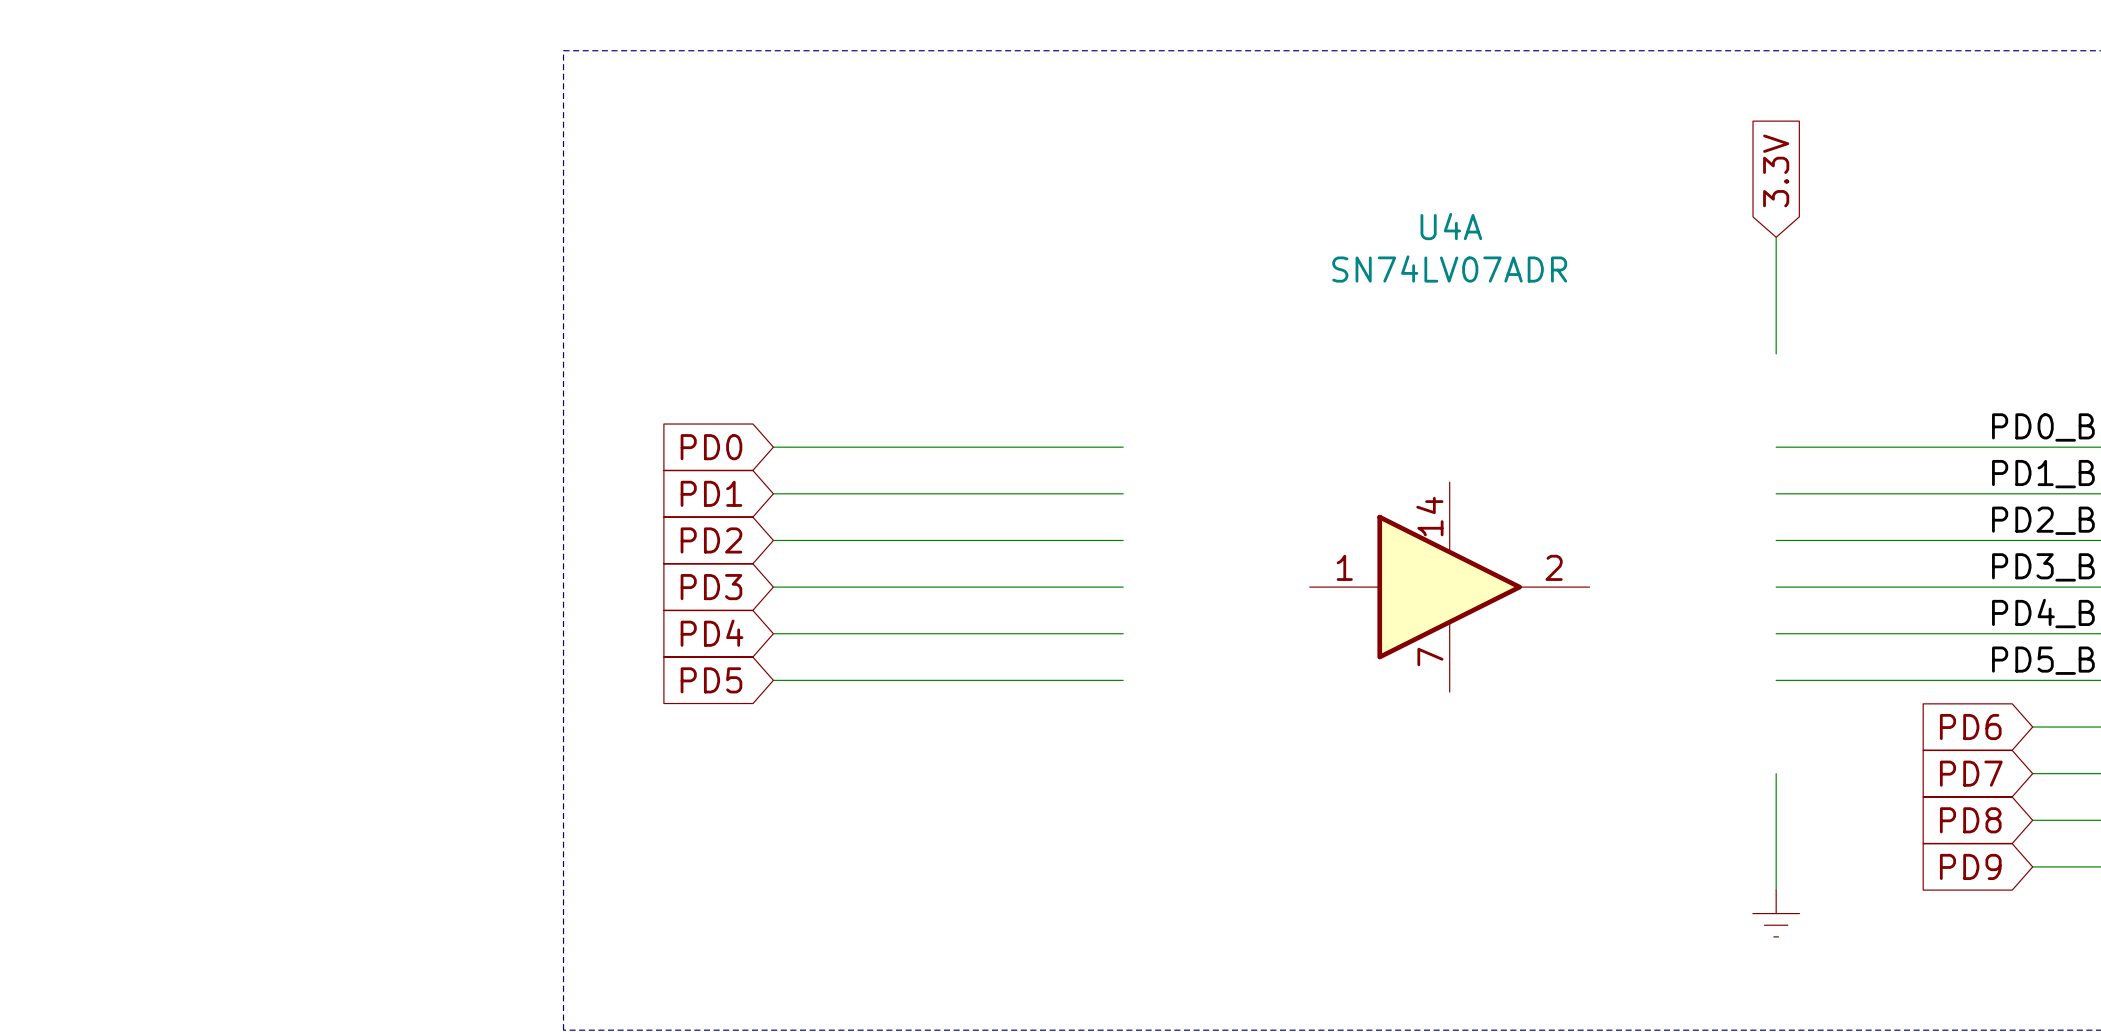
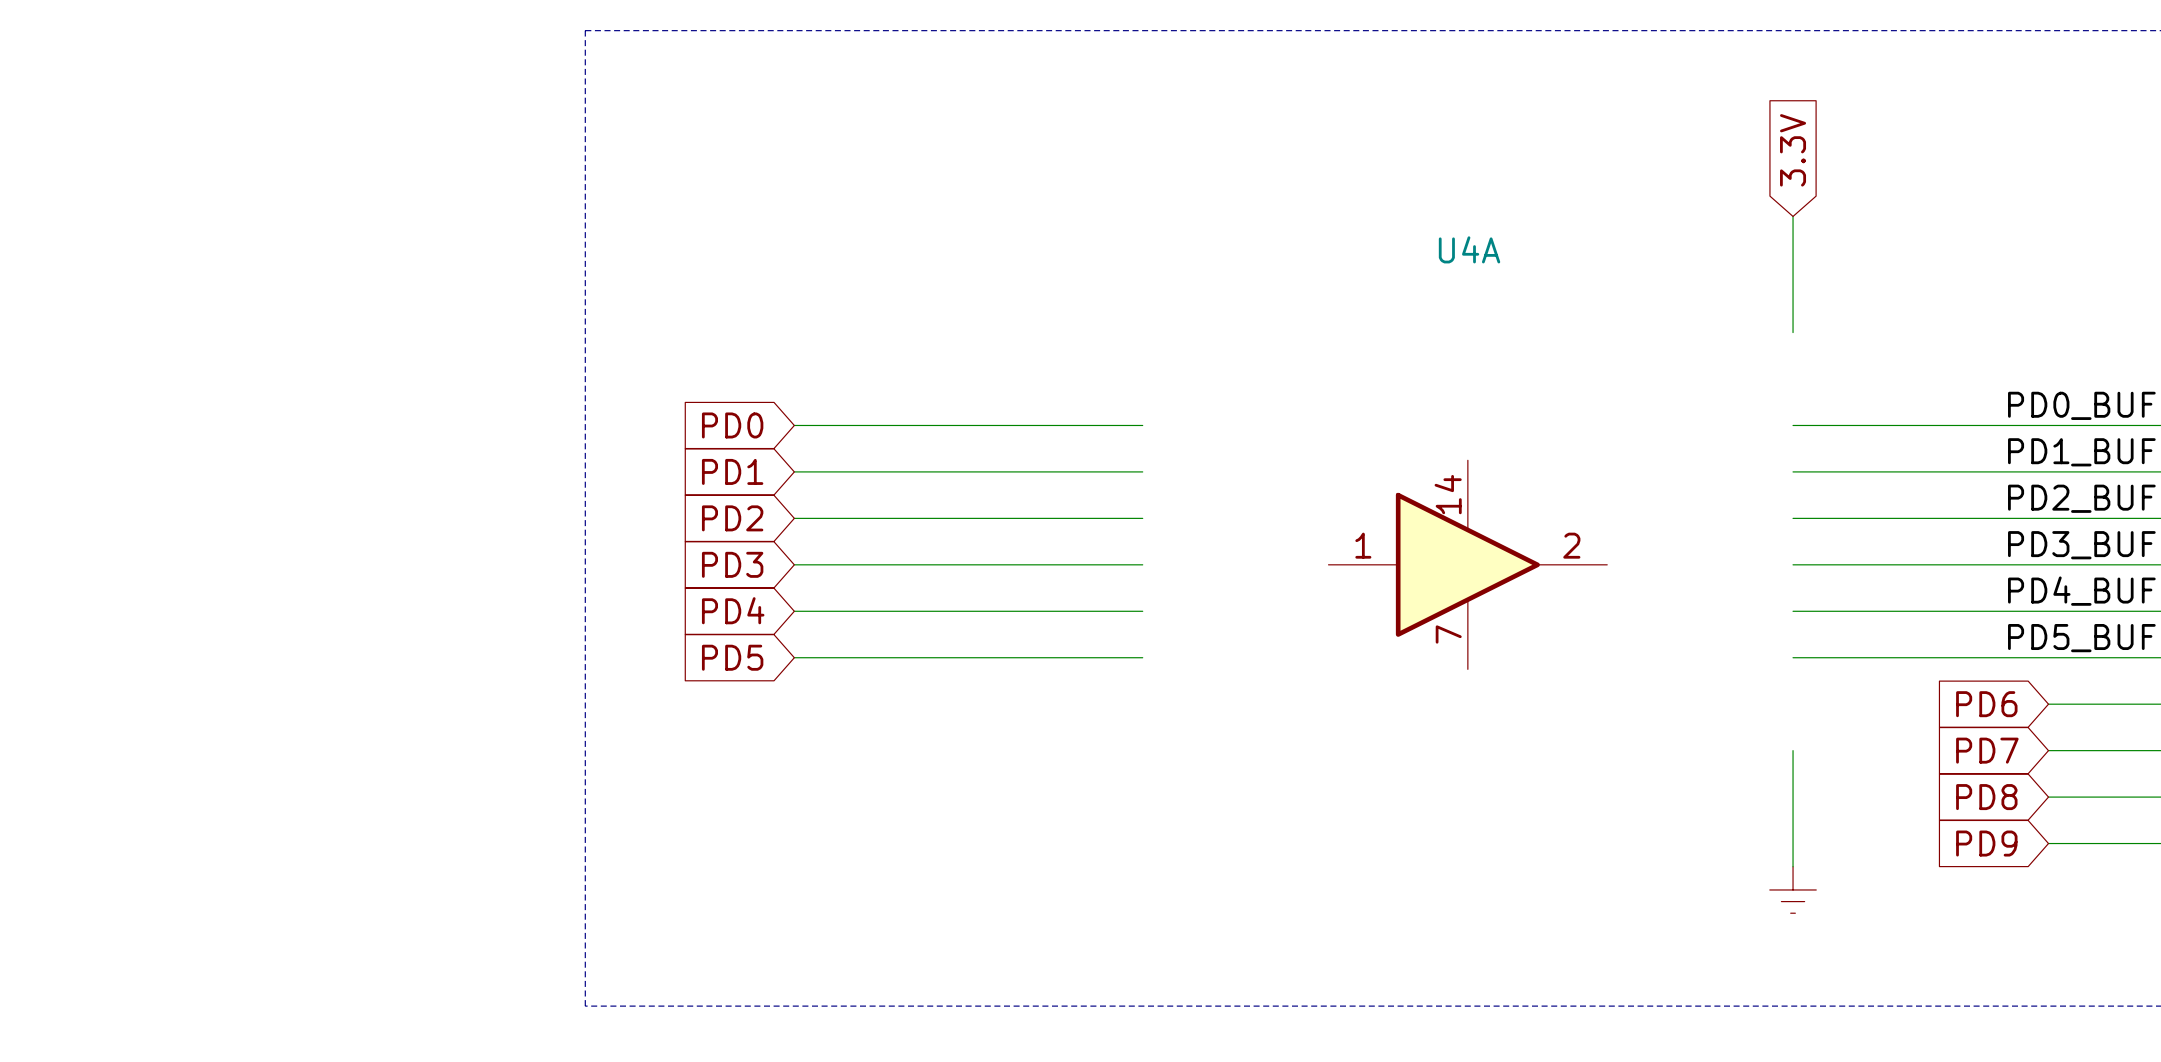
U4A name position: U4A (1451, 226) -> U4A (1469, 249)
U4A value: SN74LV07ADR (1449, 268) -> none

